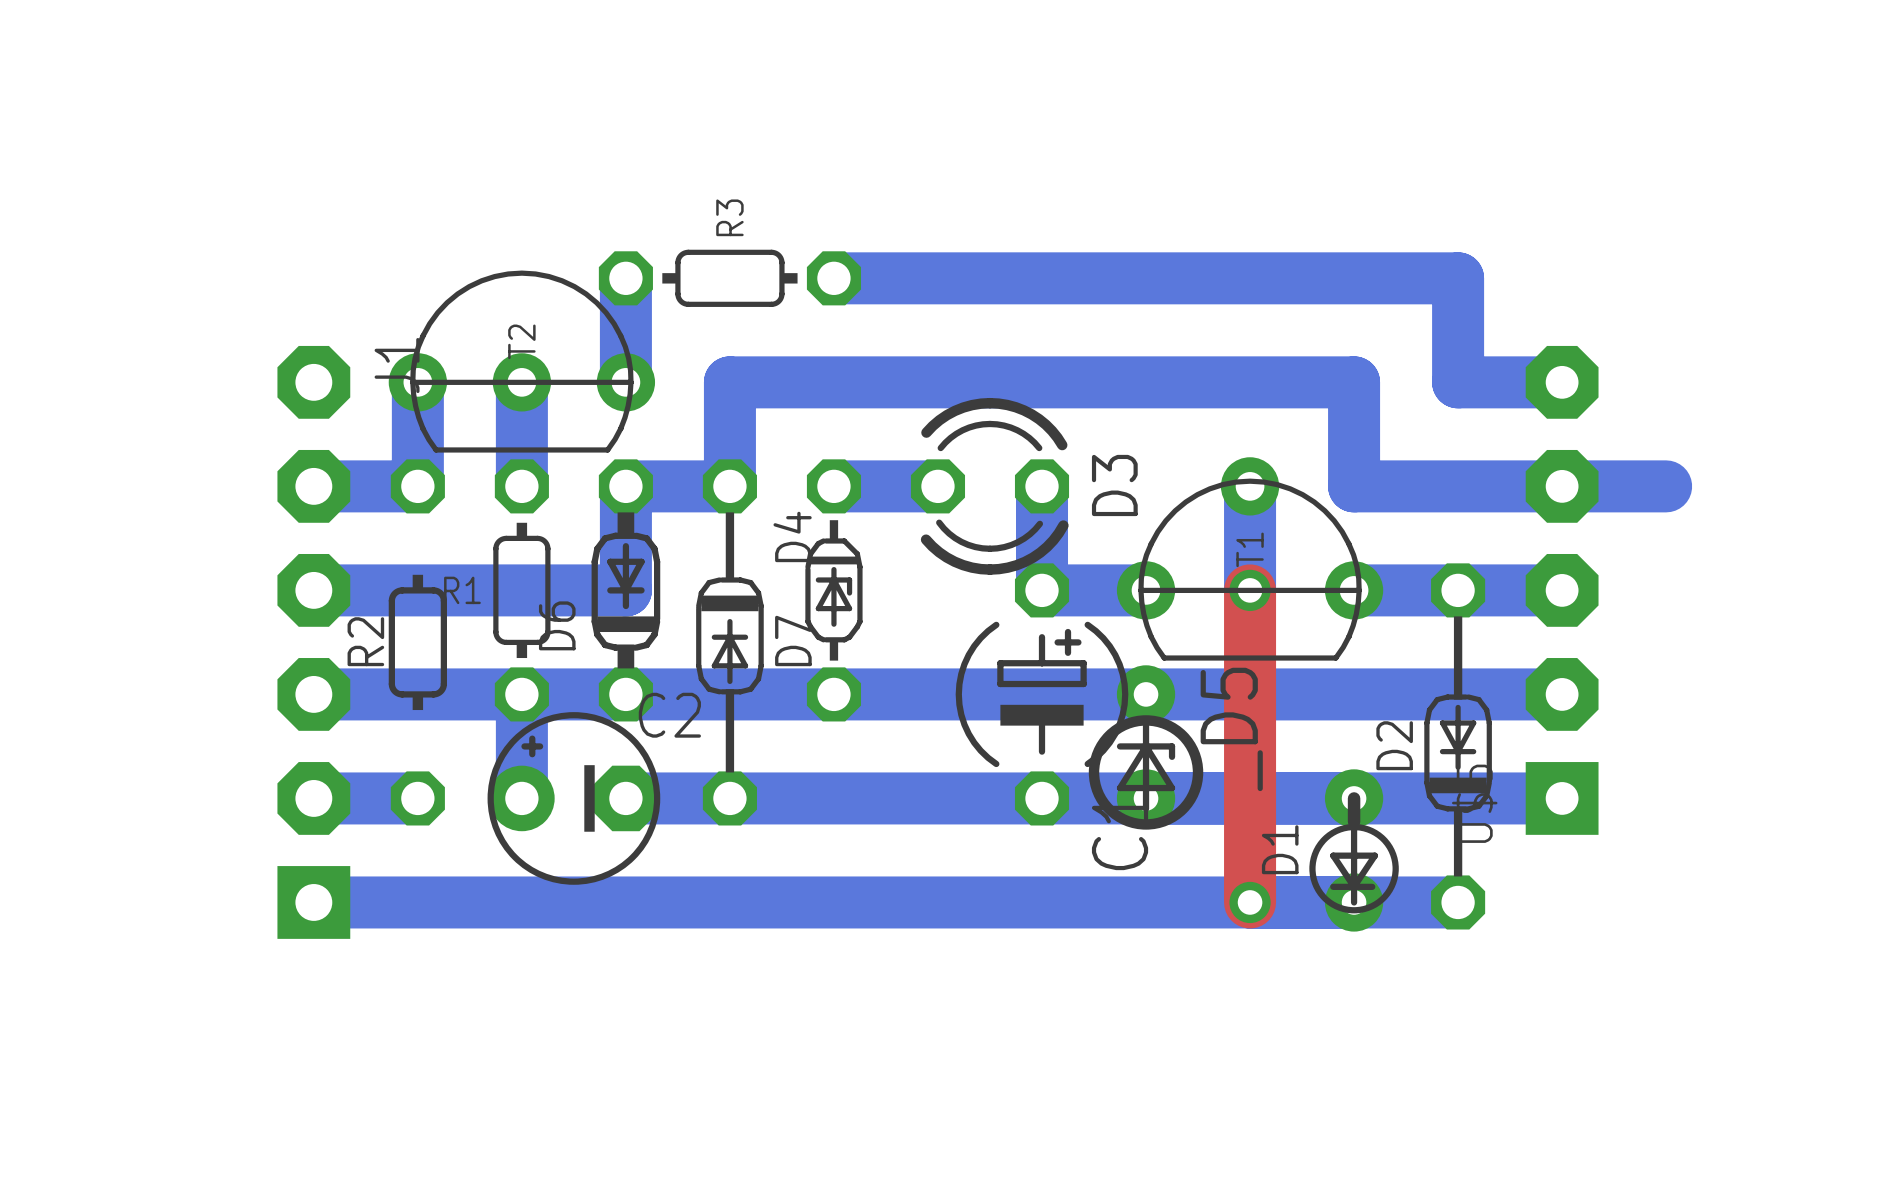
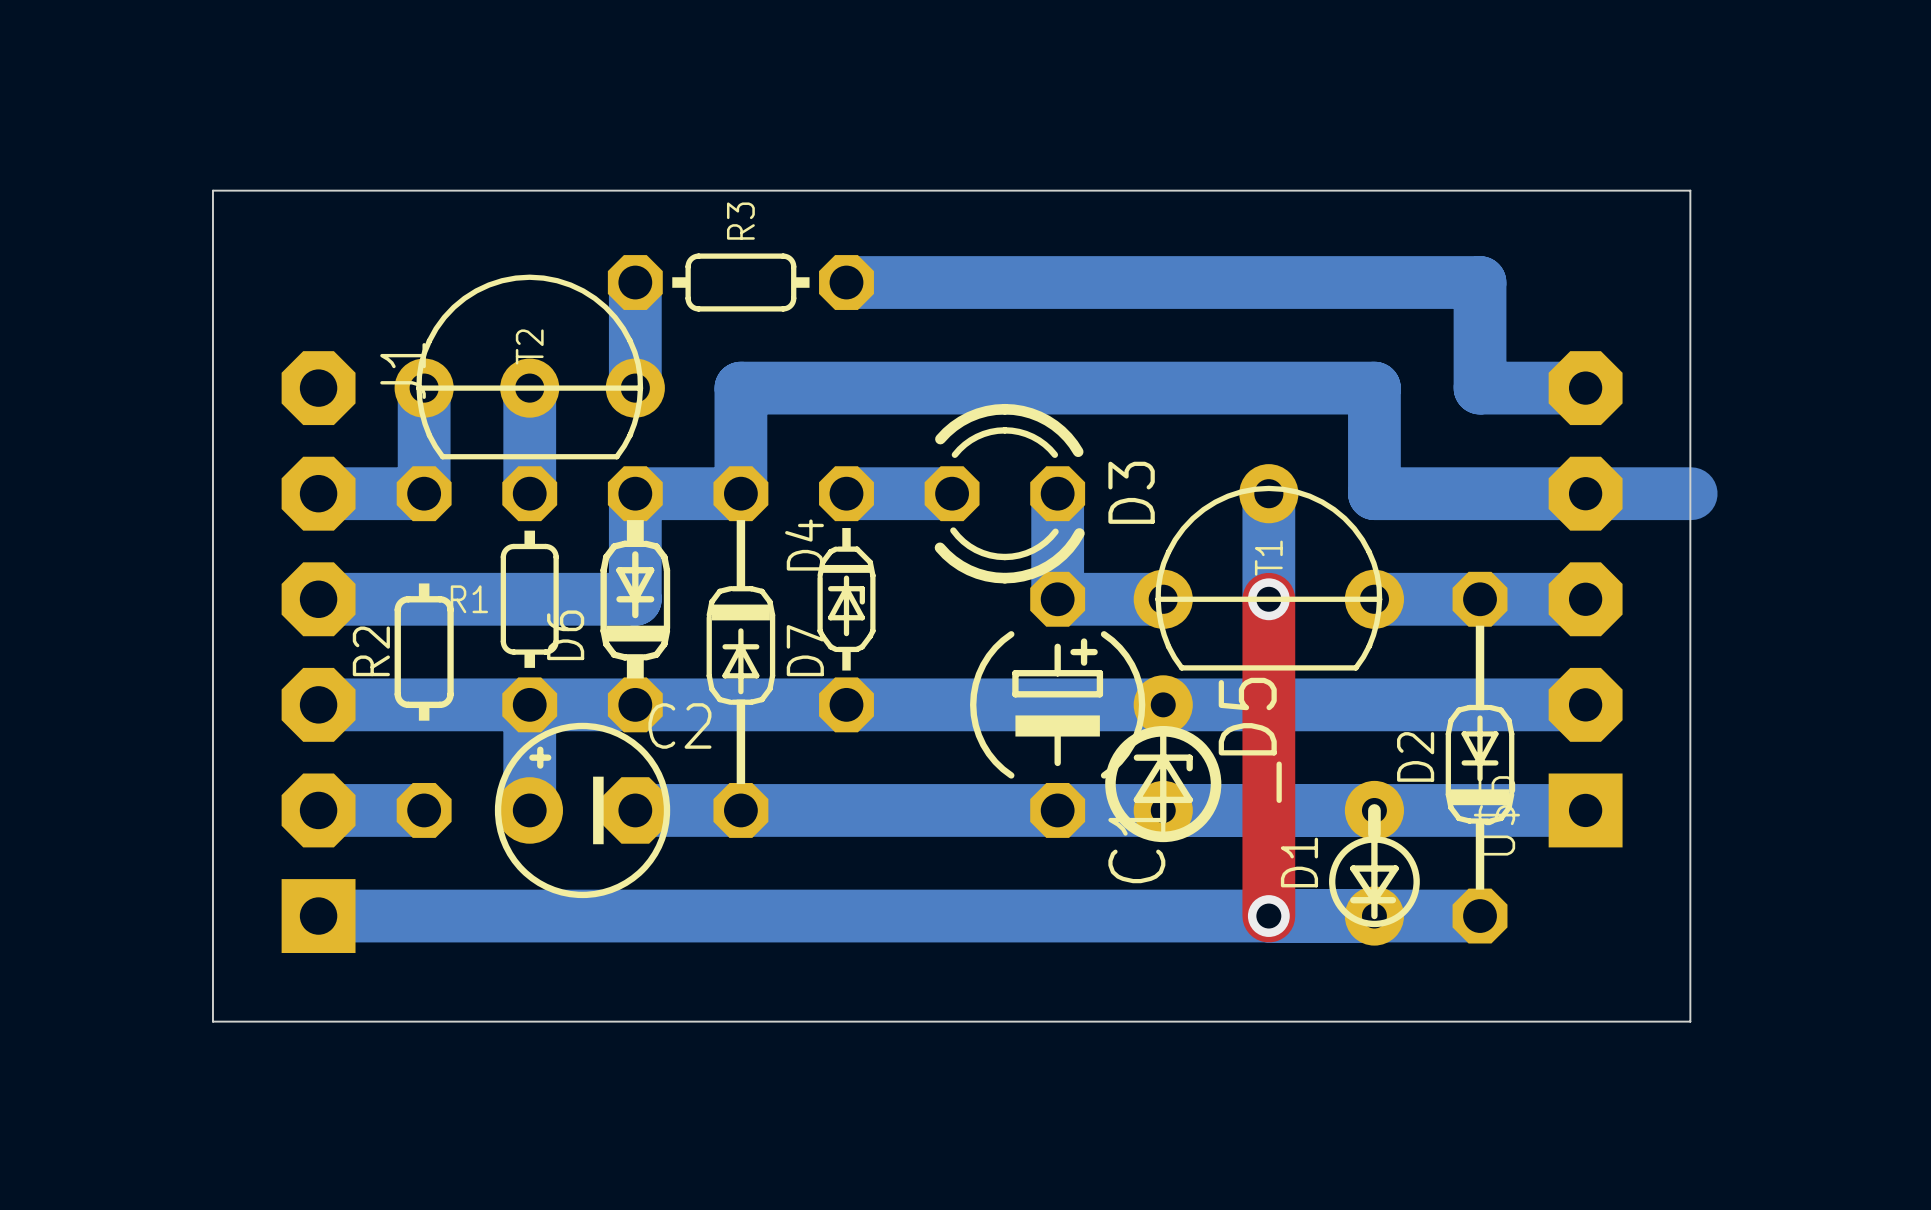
board edge: none -> (212, 190) (1690, 190) (1690, 1021) (212, 1021) (212, 190)

